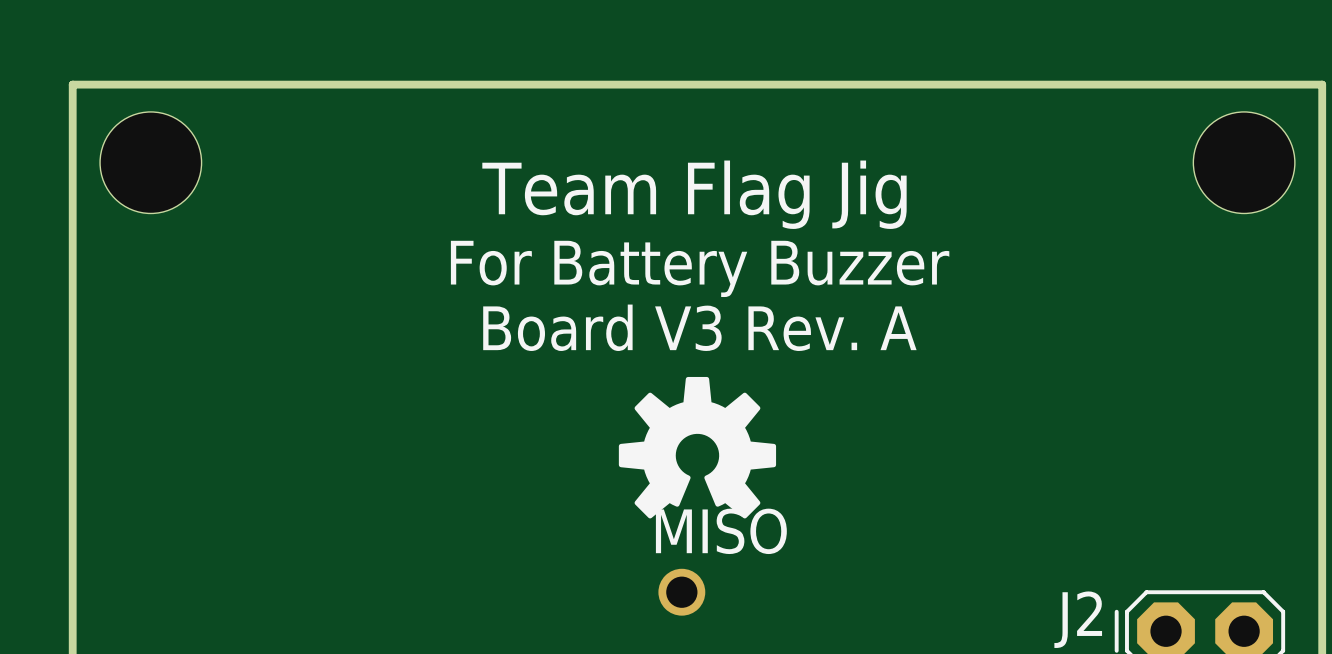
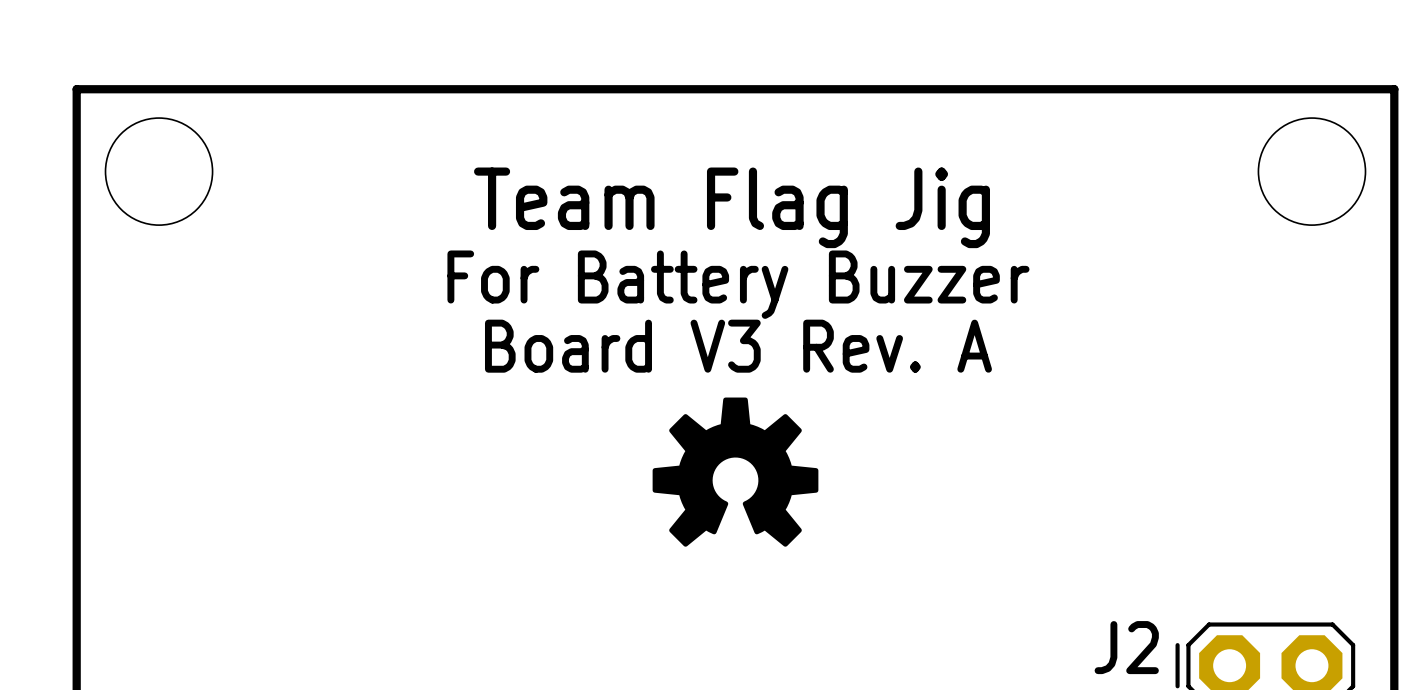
MISO: (681, 592) -> none

